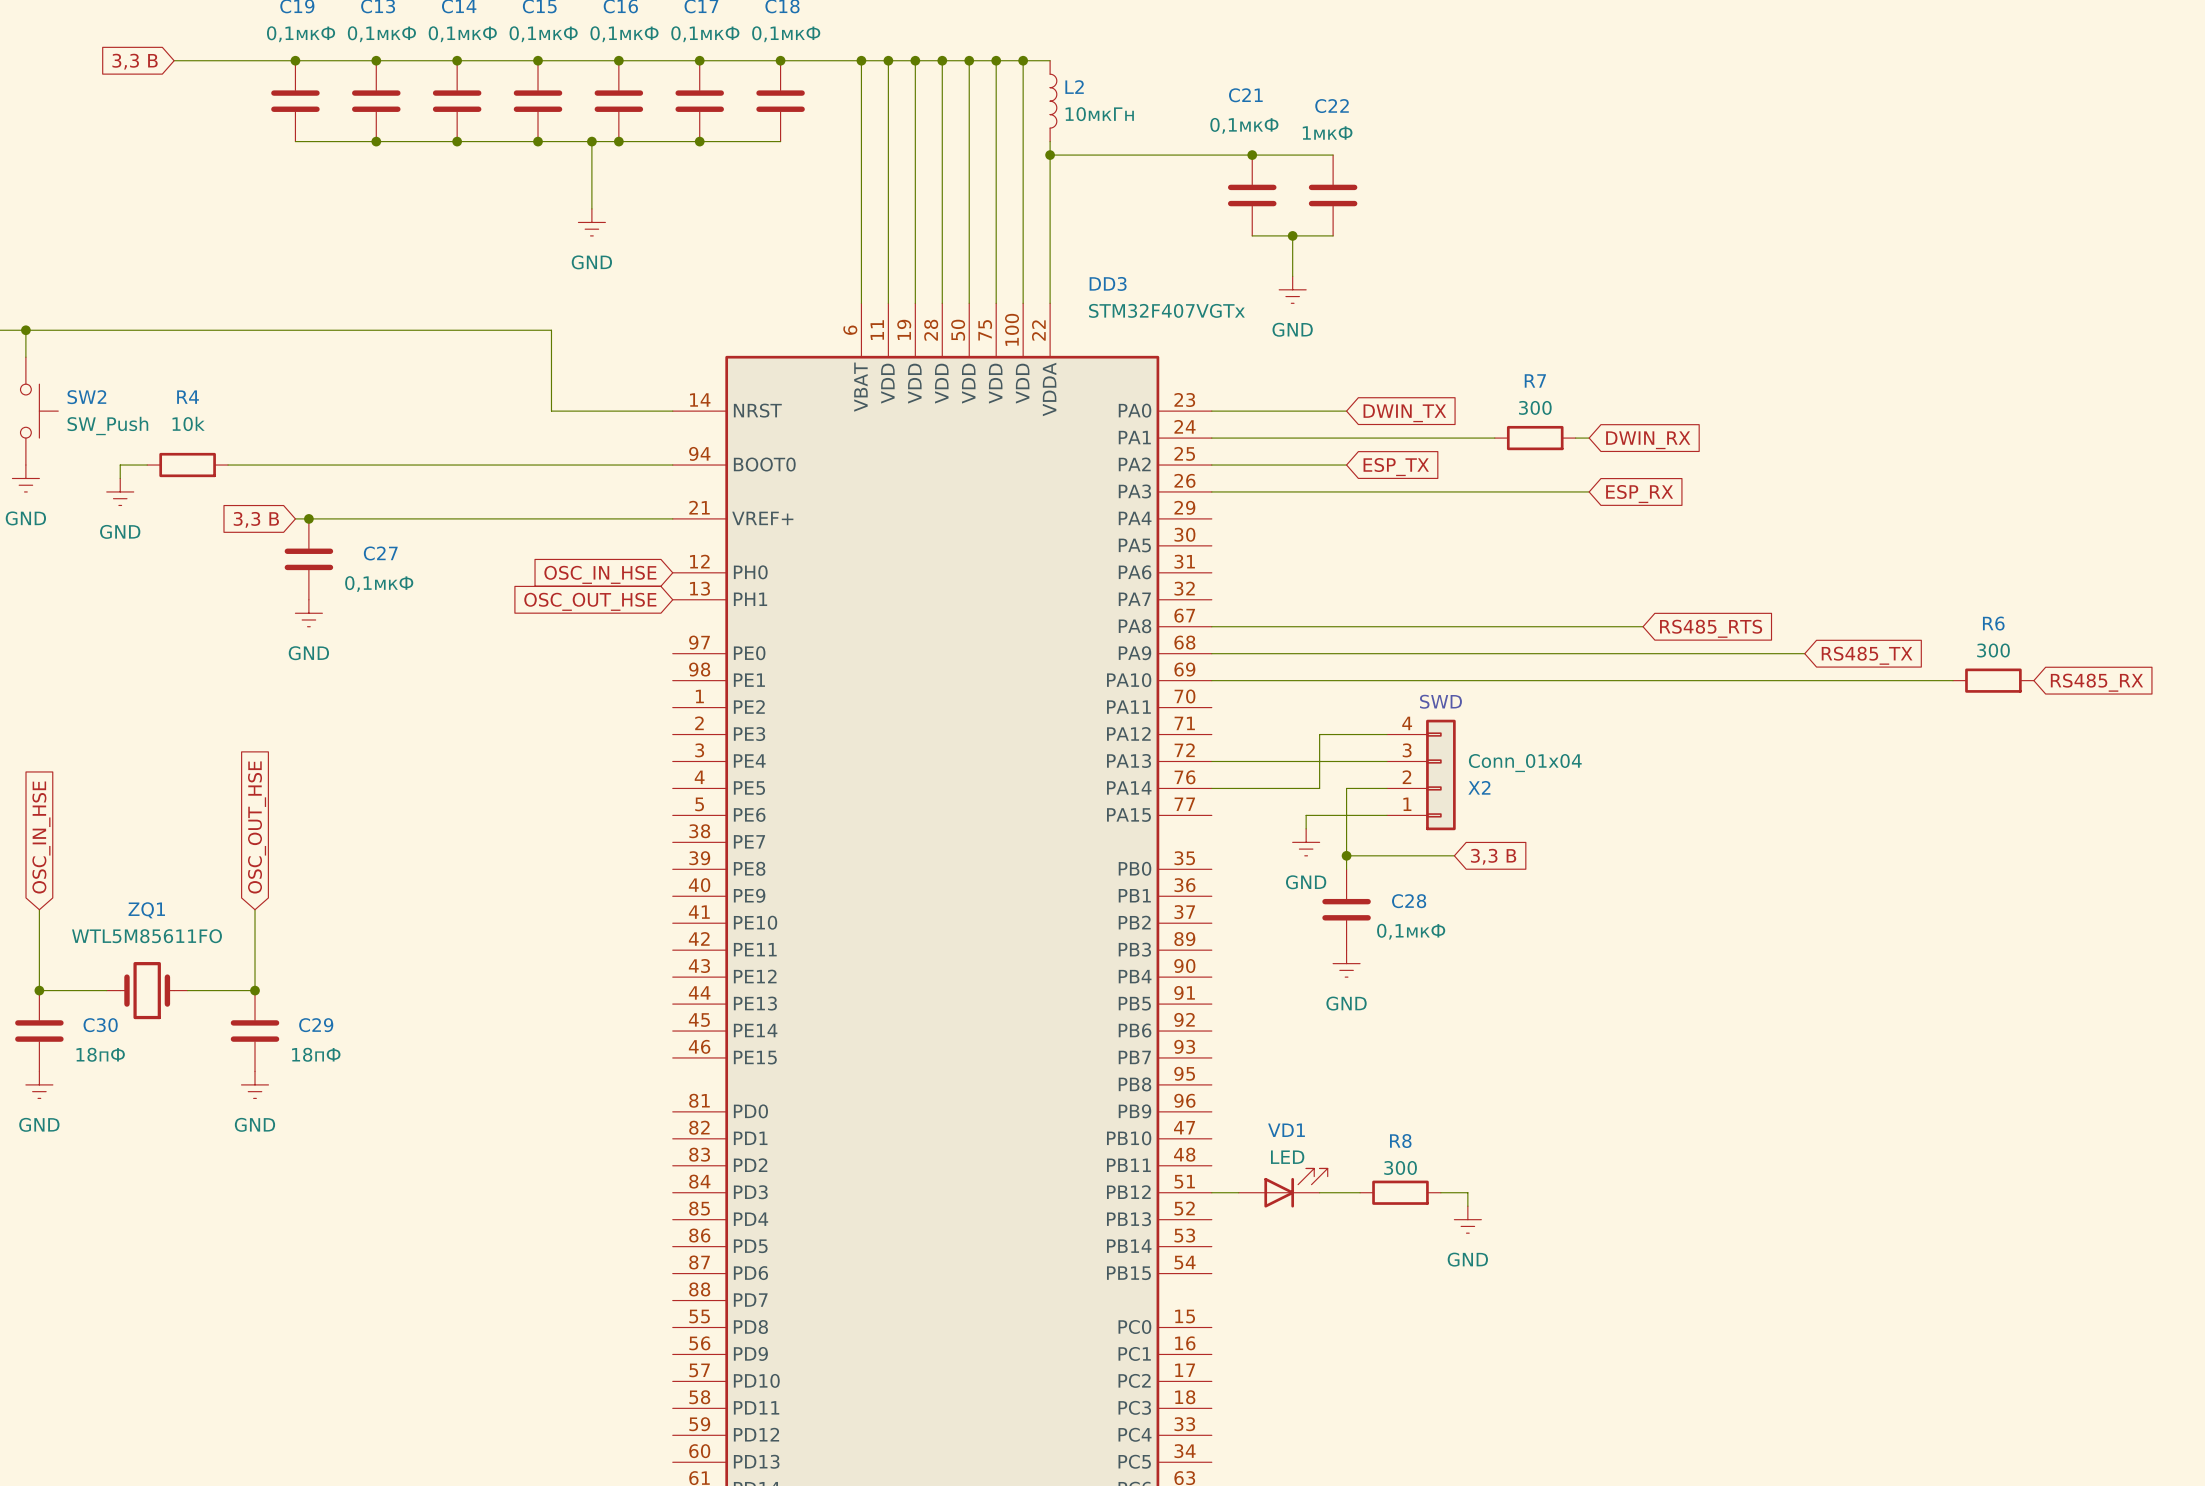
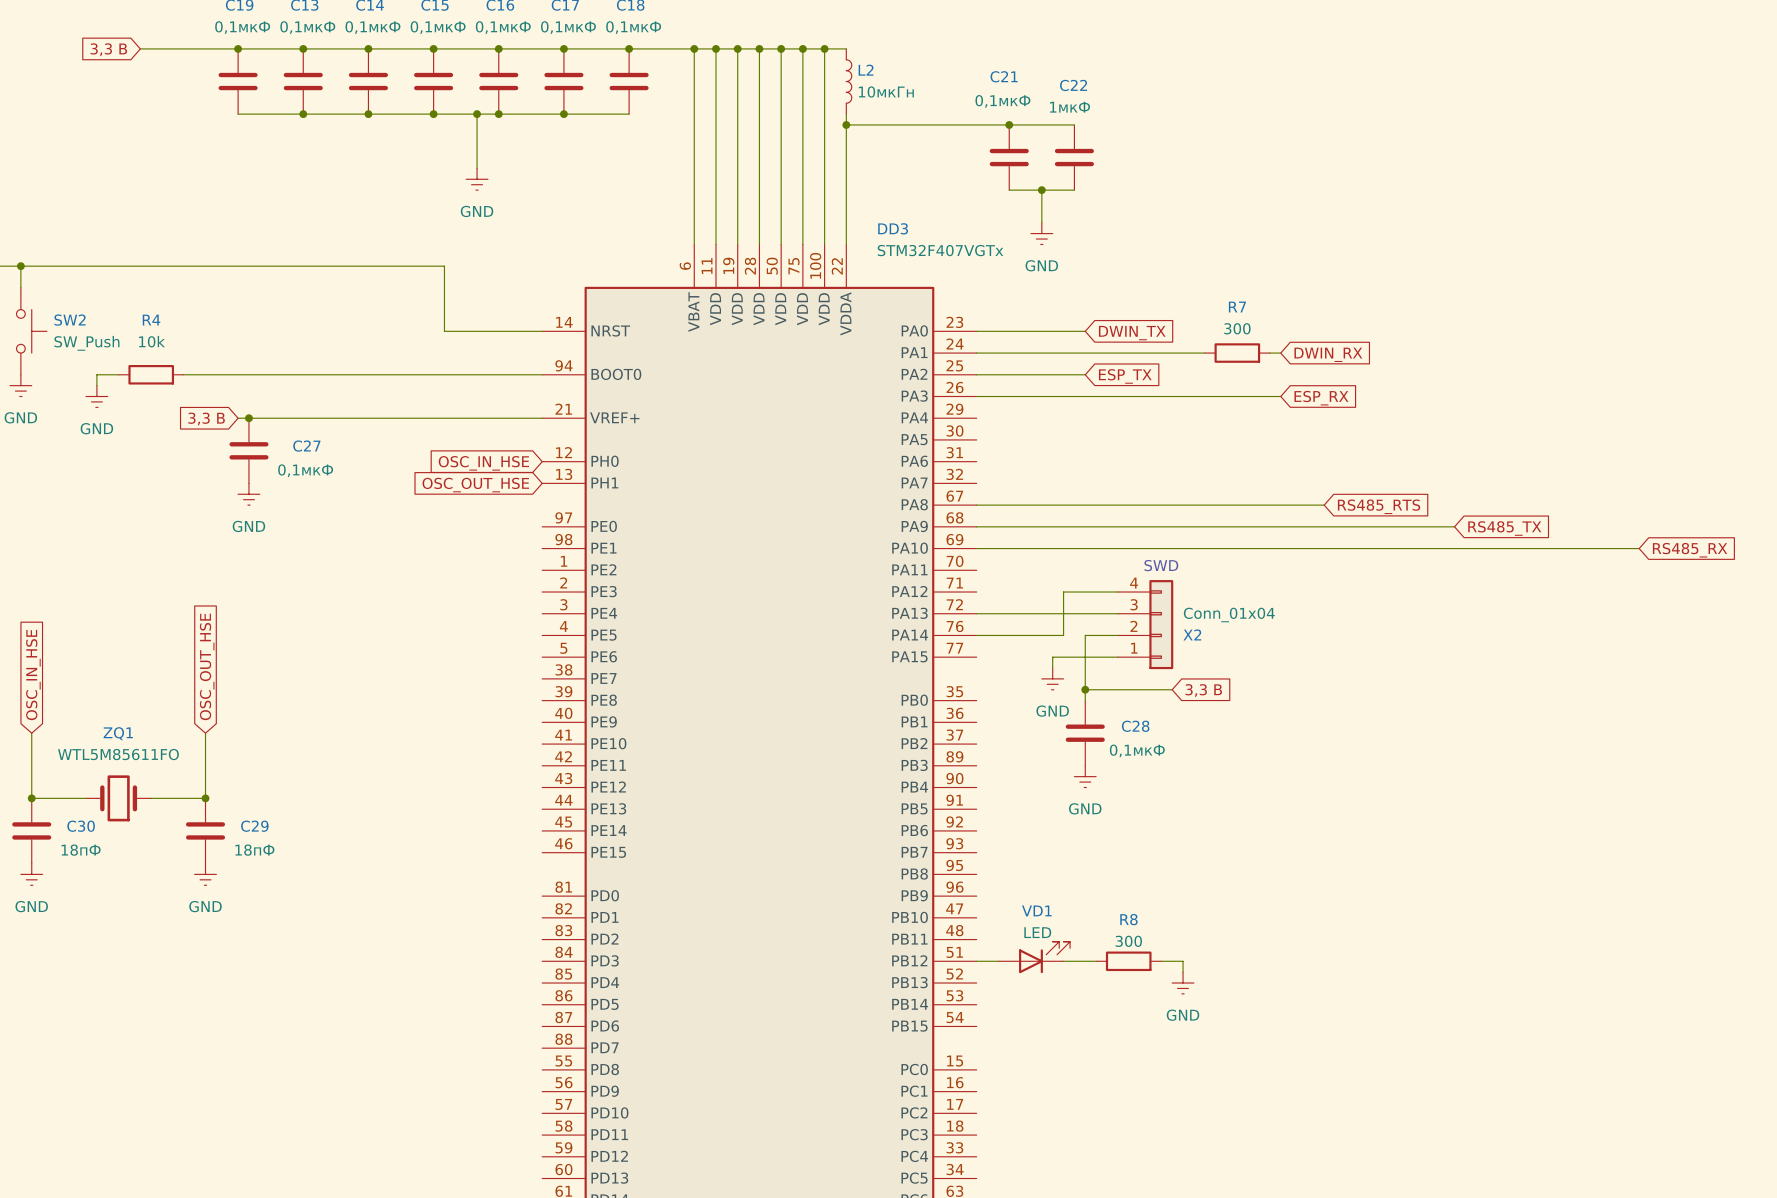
wire: none -> (1574, 548) (1639, 548)
R6: 300 (1993, 680) -> none

